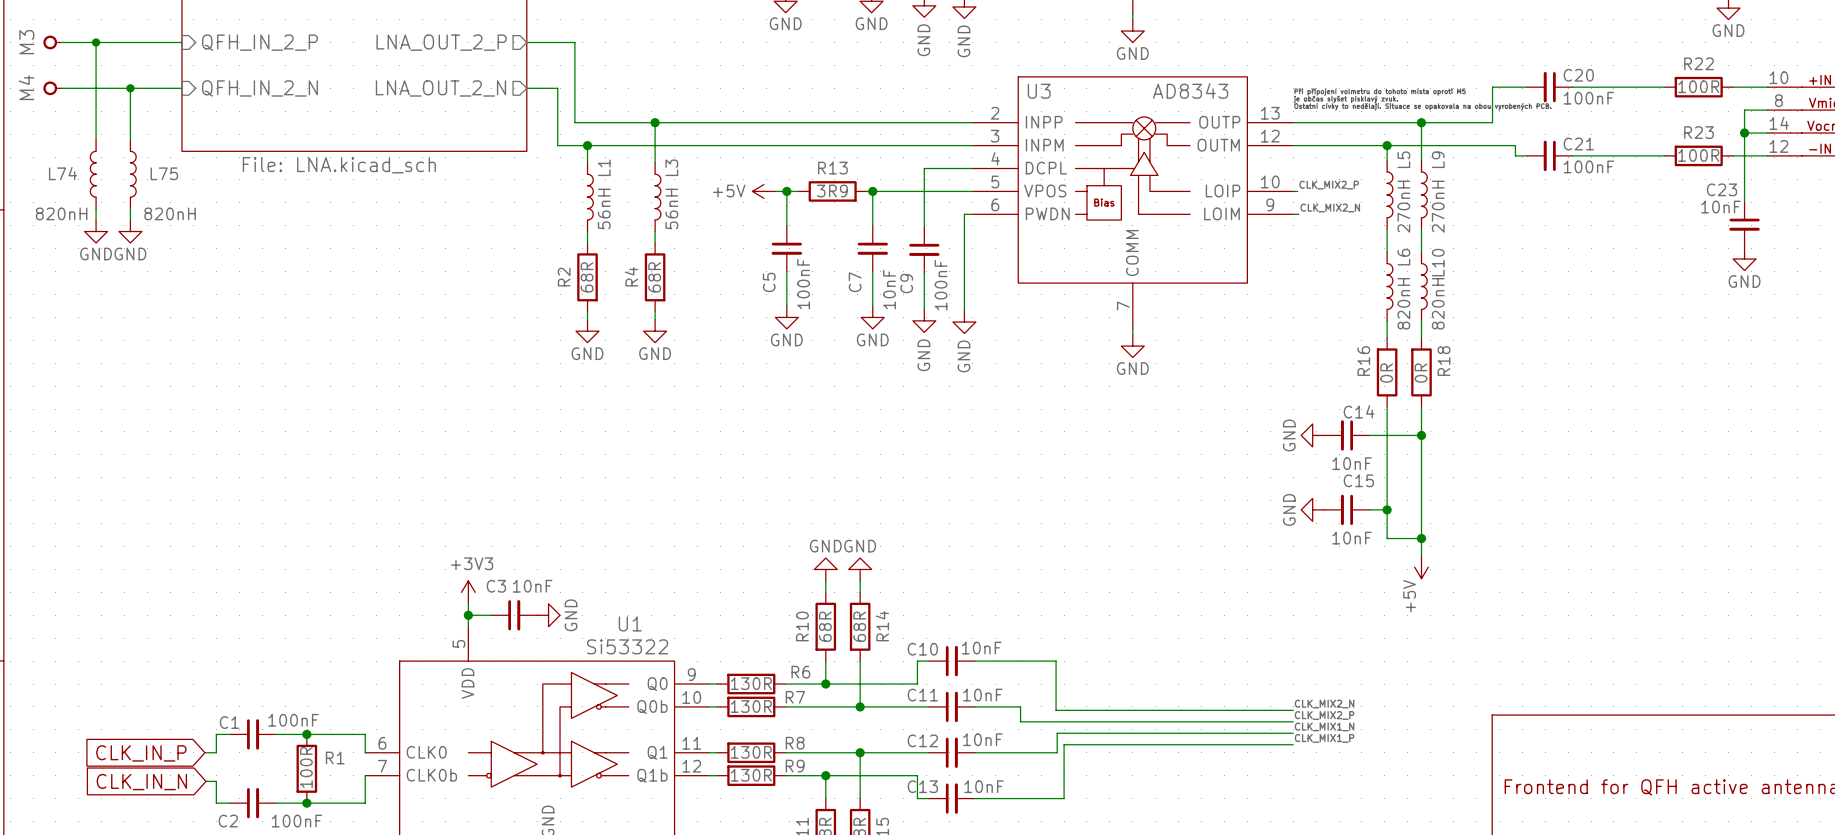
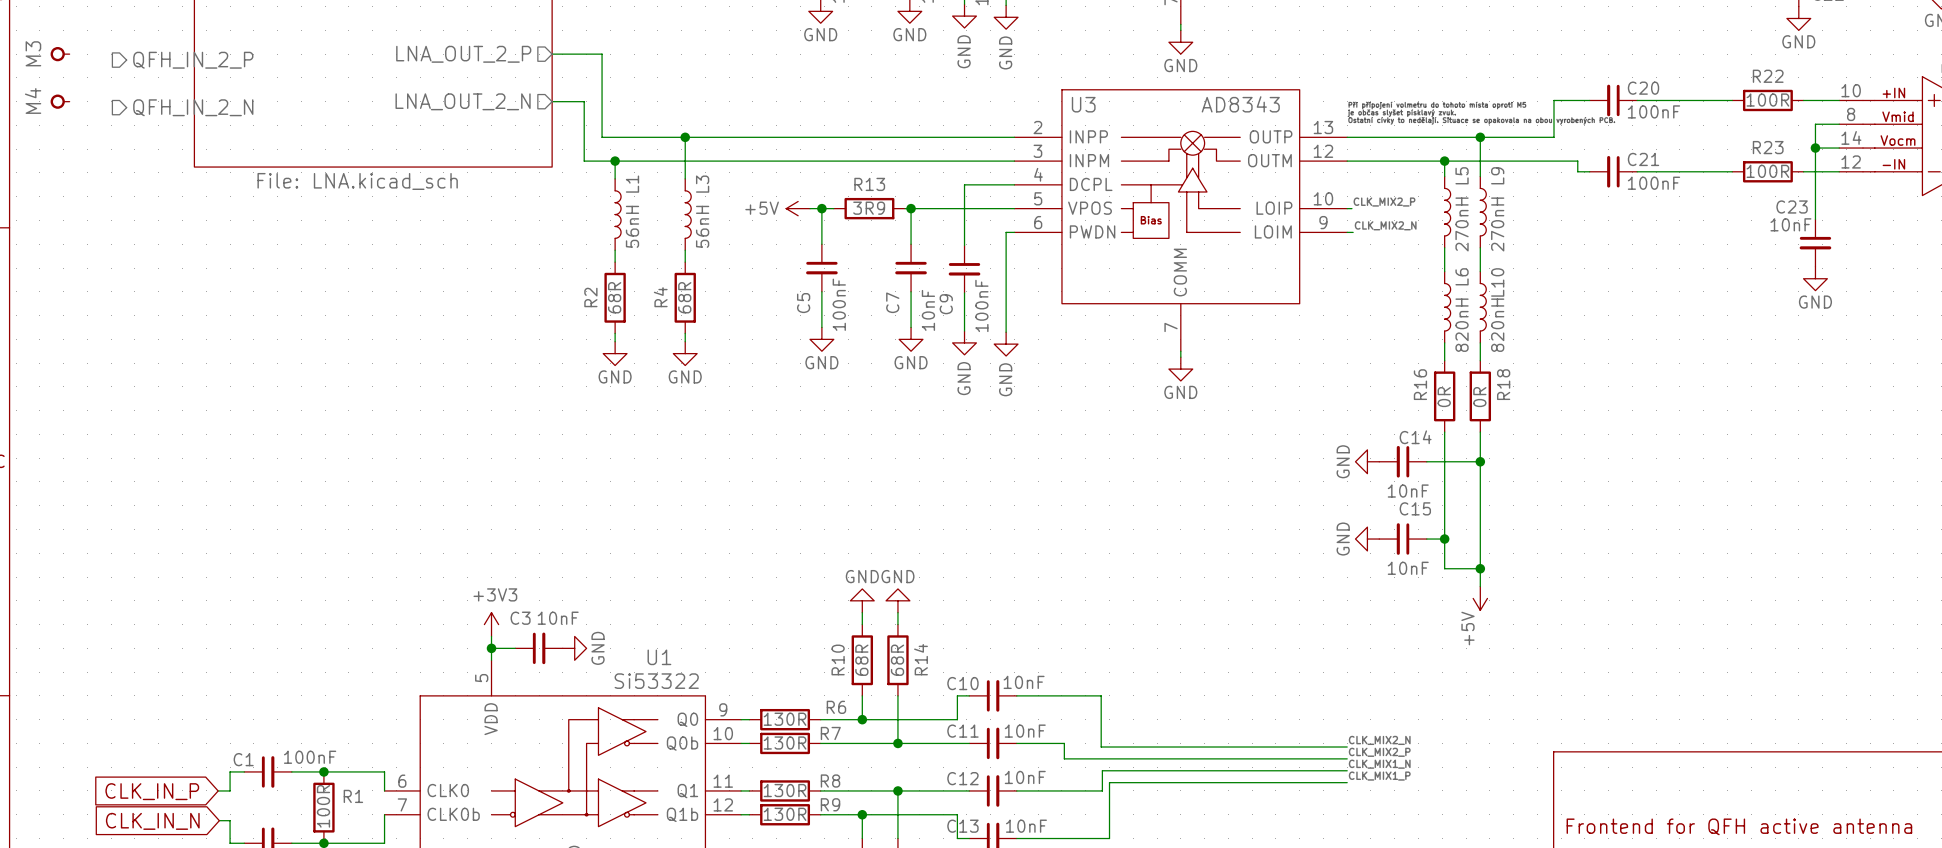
wire: (61, 42) (181, 42) -> none
wire: (96, 42) (96, 139) -> none
junction: (96, 42) -> none
sheet pin position: QFH_IN_2_P (259, 42) -> QFH_IN_2_P (193, 60)
wire: (61, 88) (181, 88) -> none
wire: (130, 88) (130, 139) -> none
junction: (130, 88) -> none
sheet pin position: QFH_IN_2_N (259, 88) -> QFH_IN_2_N (193, 107)
L74: 820nH (93, 174) -> none
L75: 820nH (133, 174) -> none
wire: (96, 208) (96, 220) -> none
wire: (130, 208) (130, 220) -> none
power symbol: GND (96, 231) -> none
power symbol: GND (130, 231) -> none

